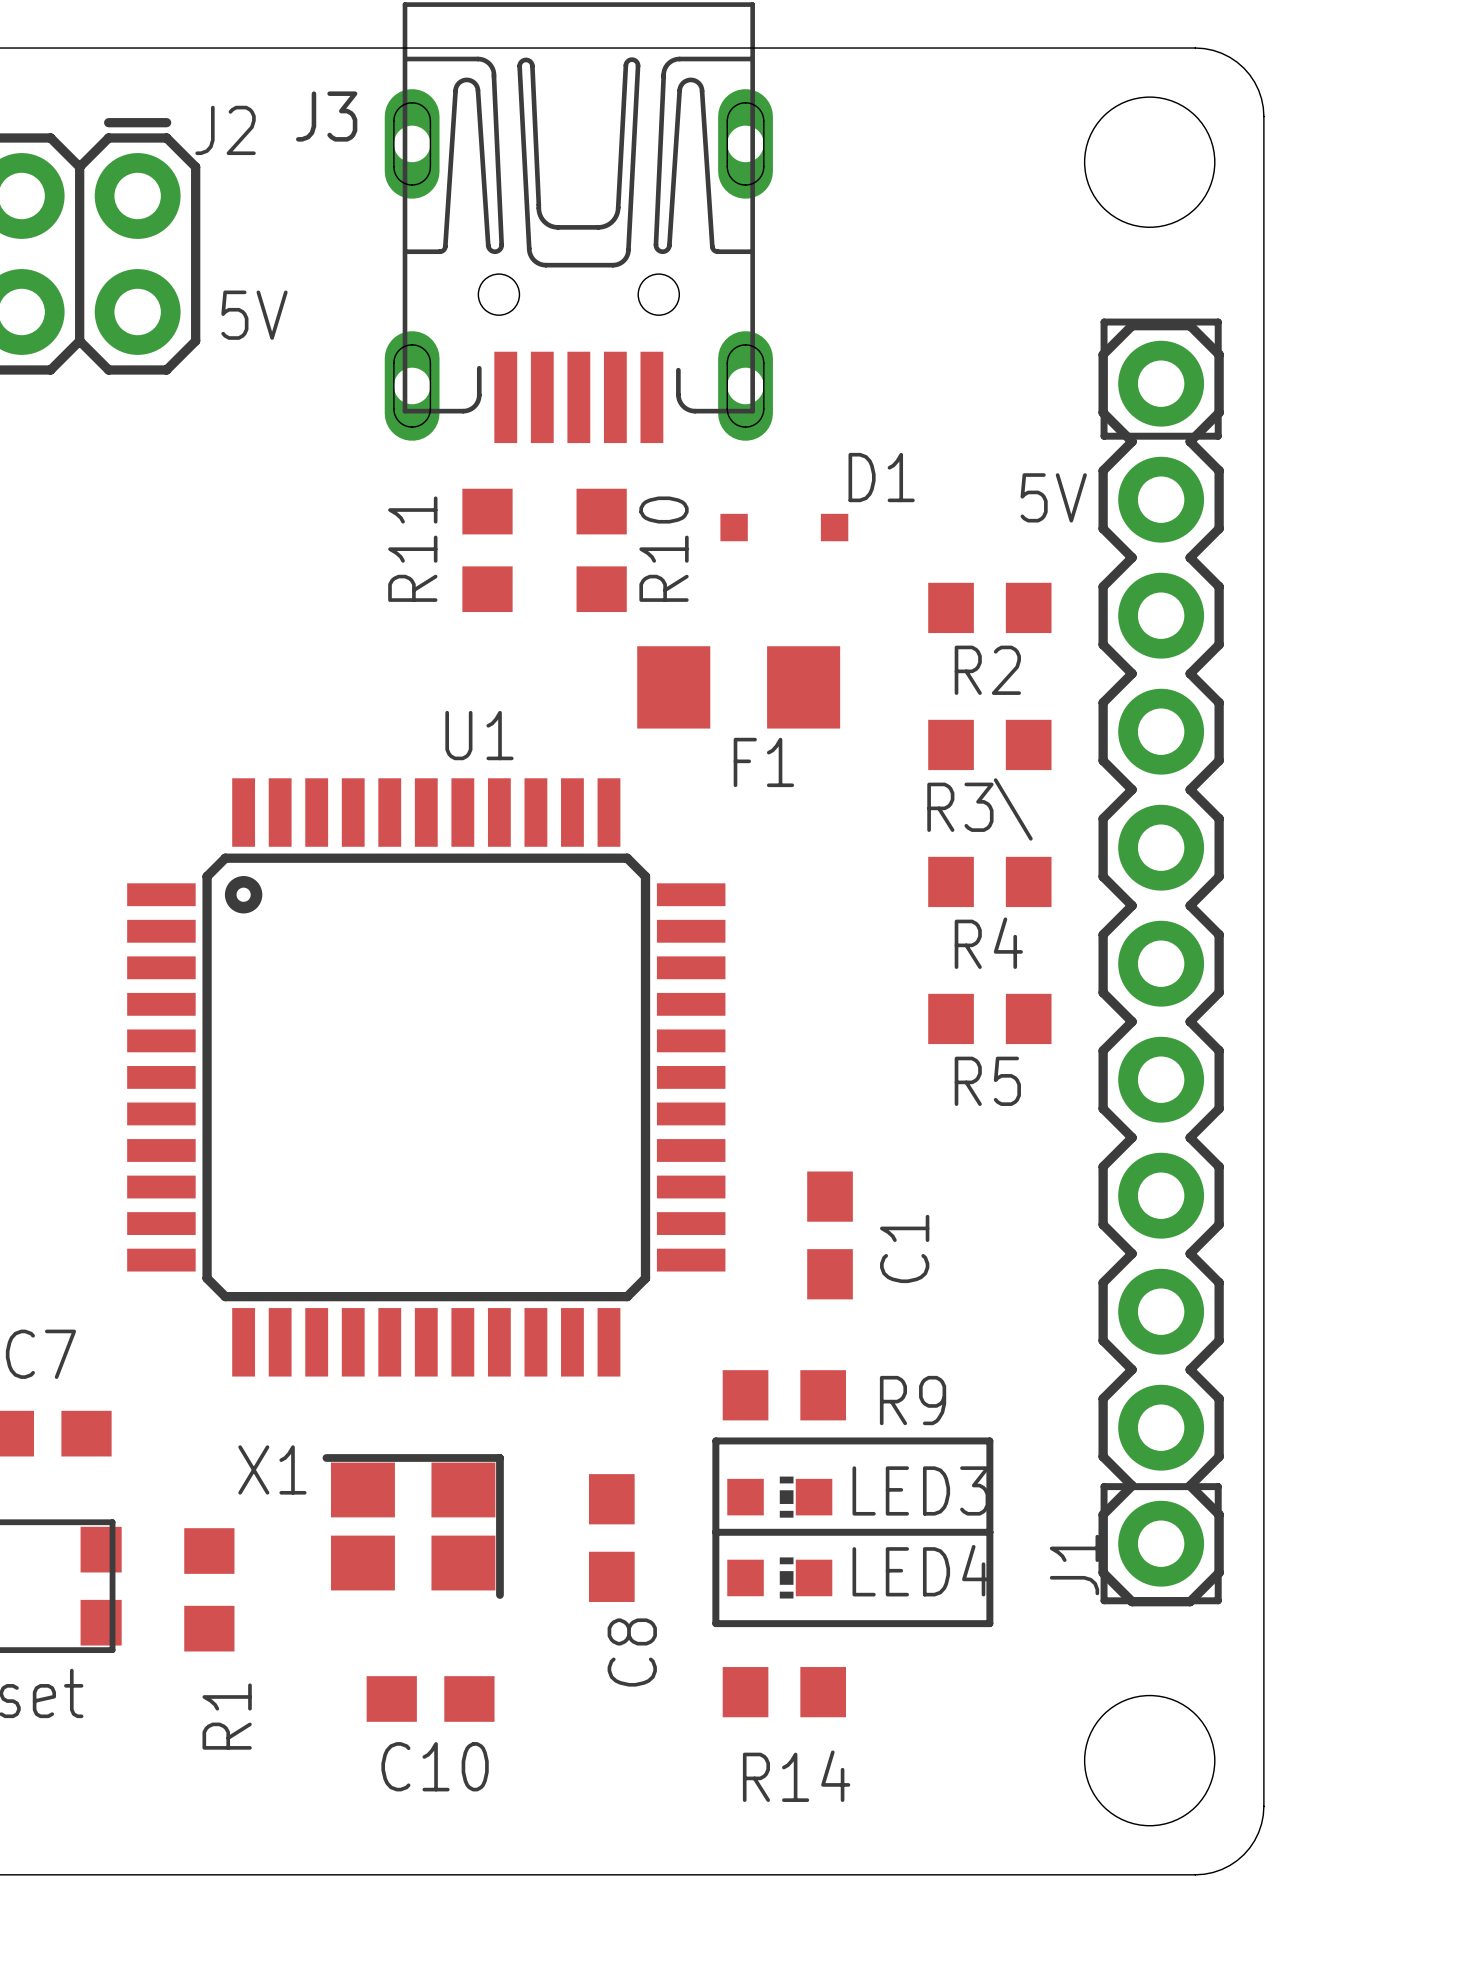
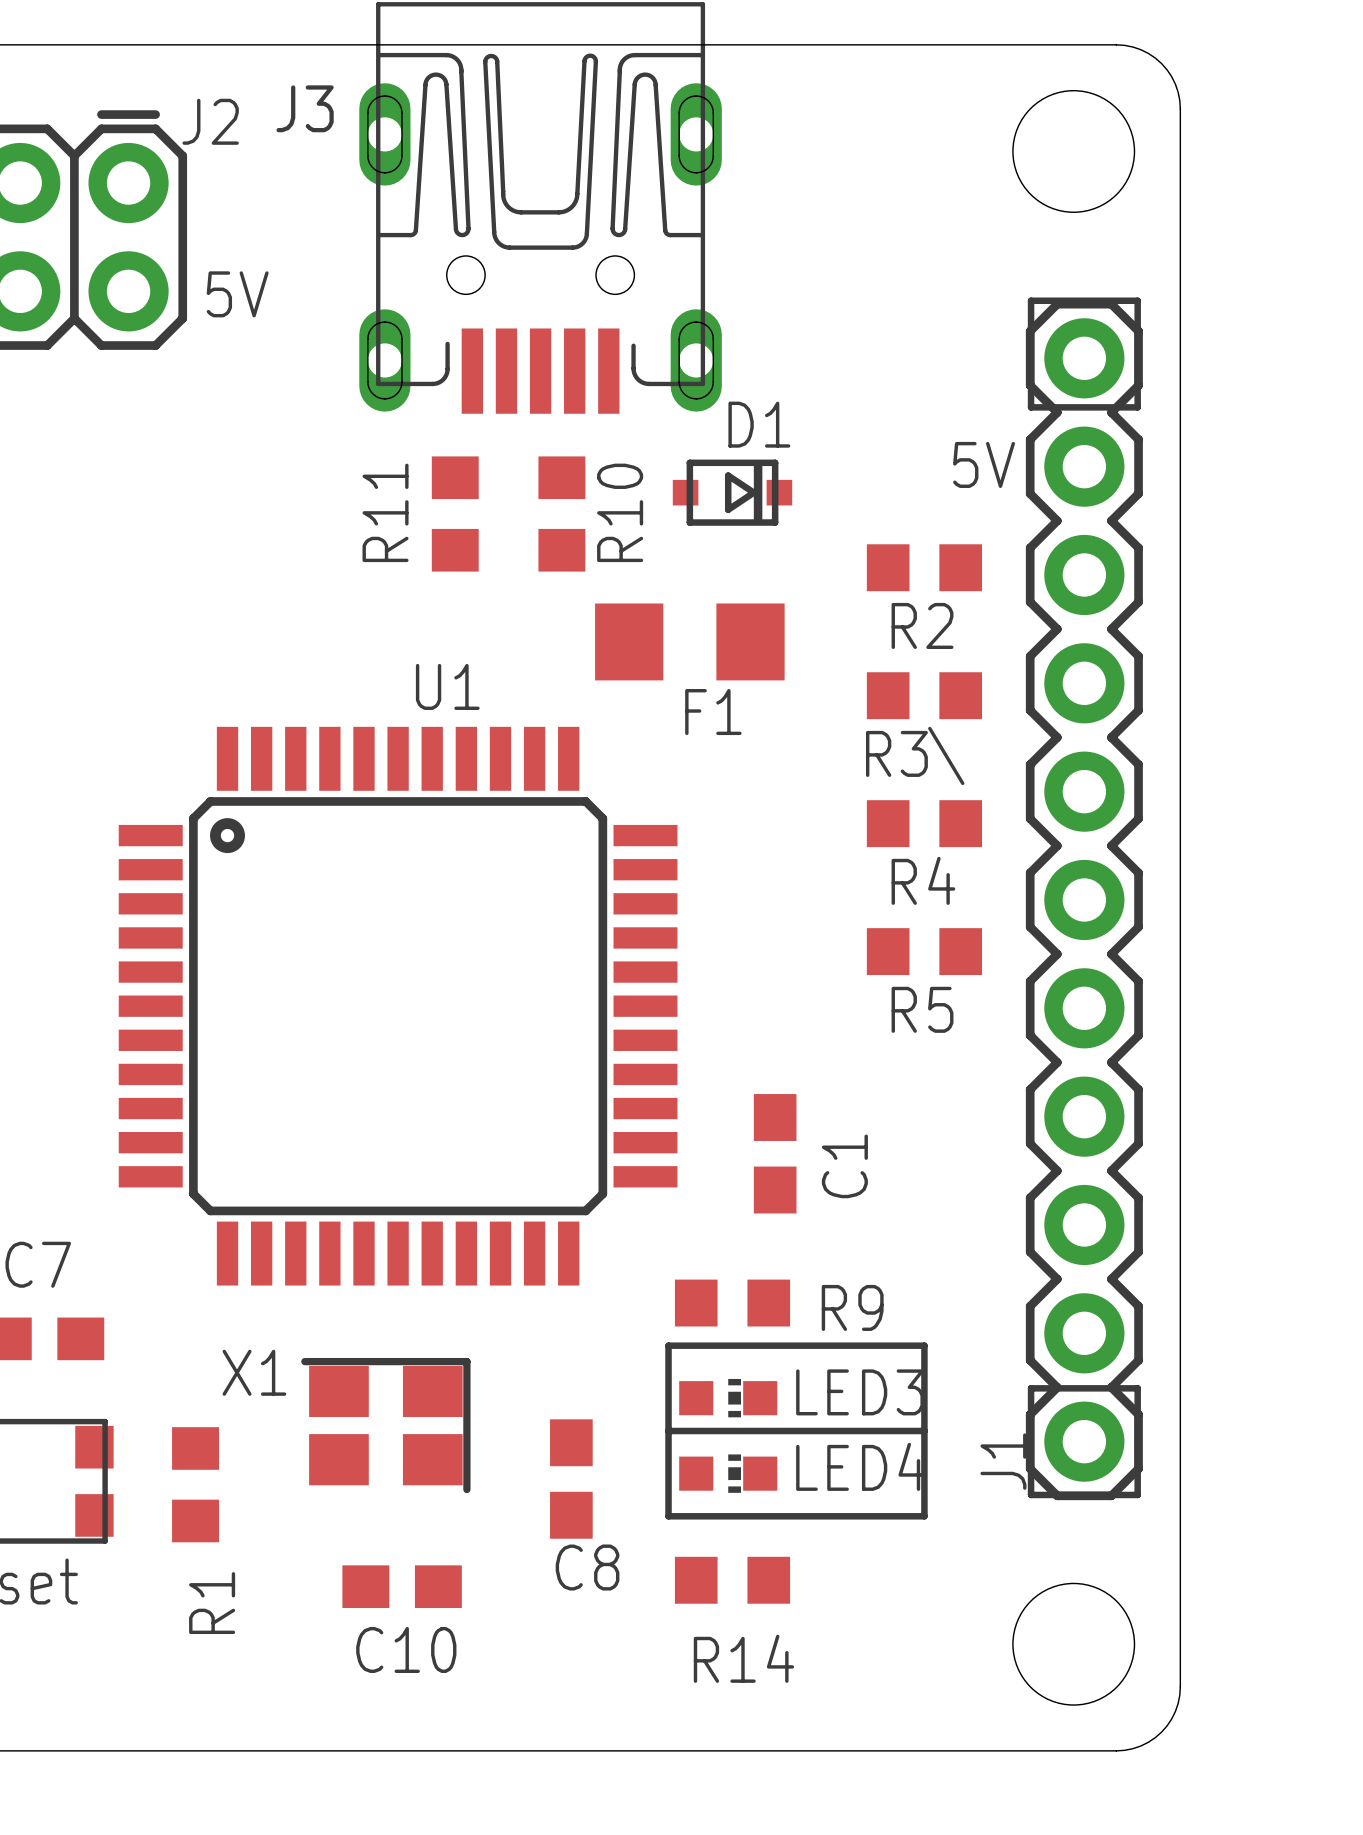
D1 footprint: [720, 513, 849, 542] -> [672, 459, 793, 526]
C8 position: (611, 1538) -> (571, 1479)
C8 name rotation: 0° (632, 1652) -> 90° clockwise (587, 1567)

